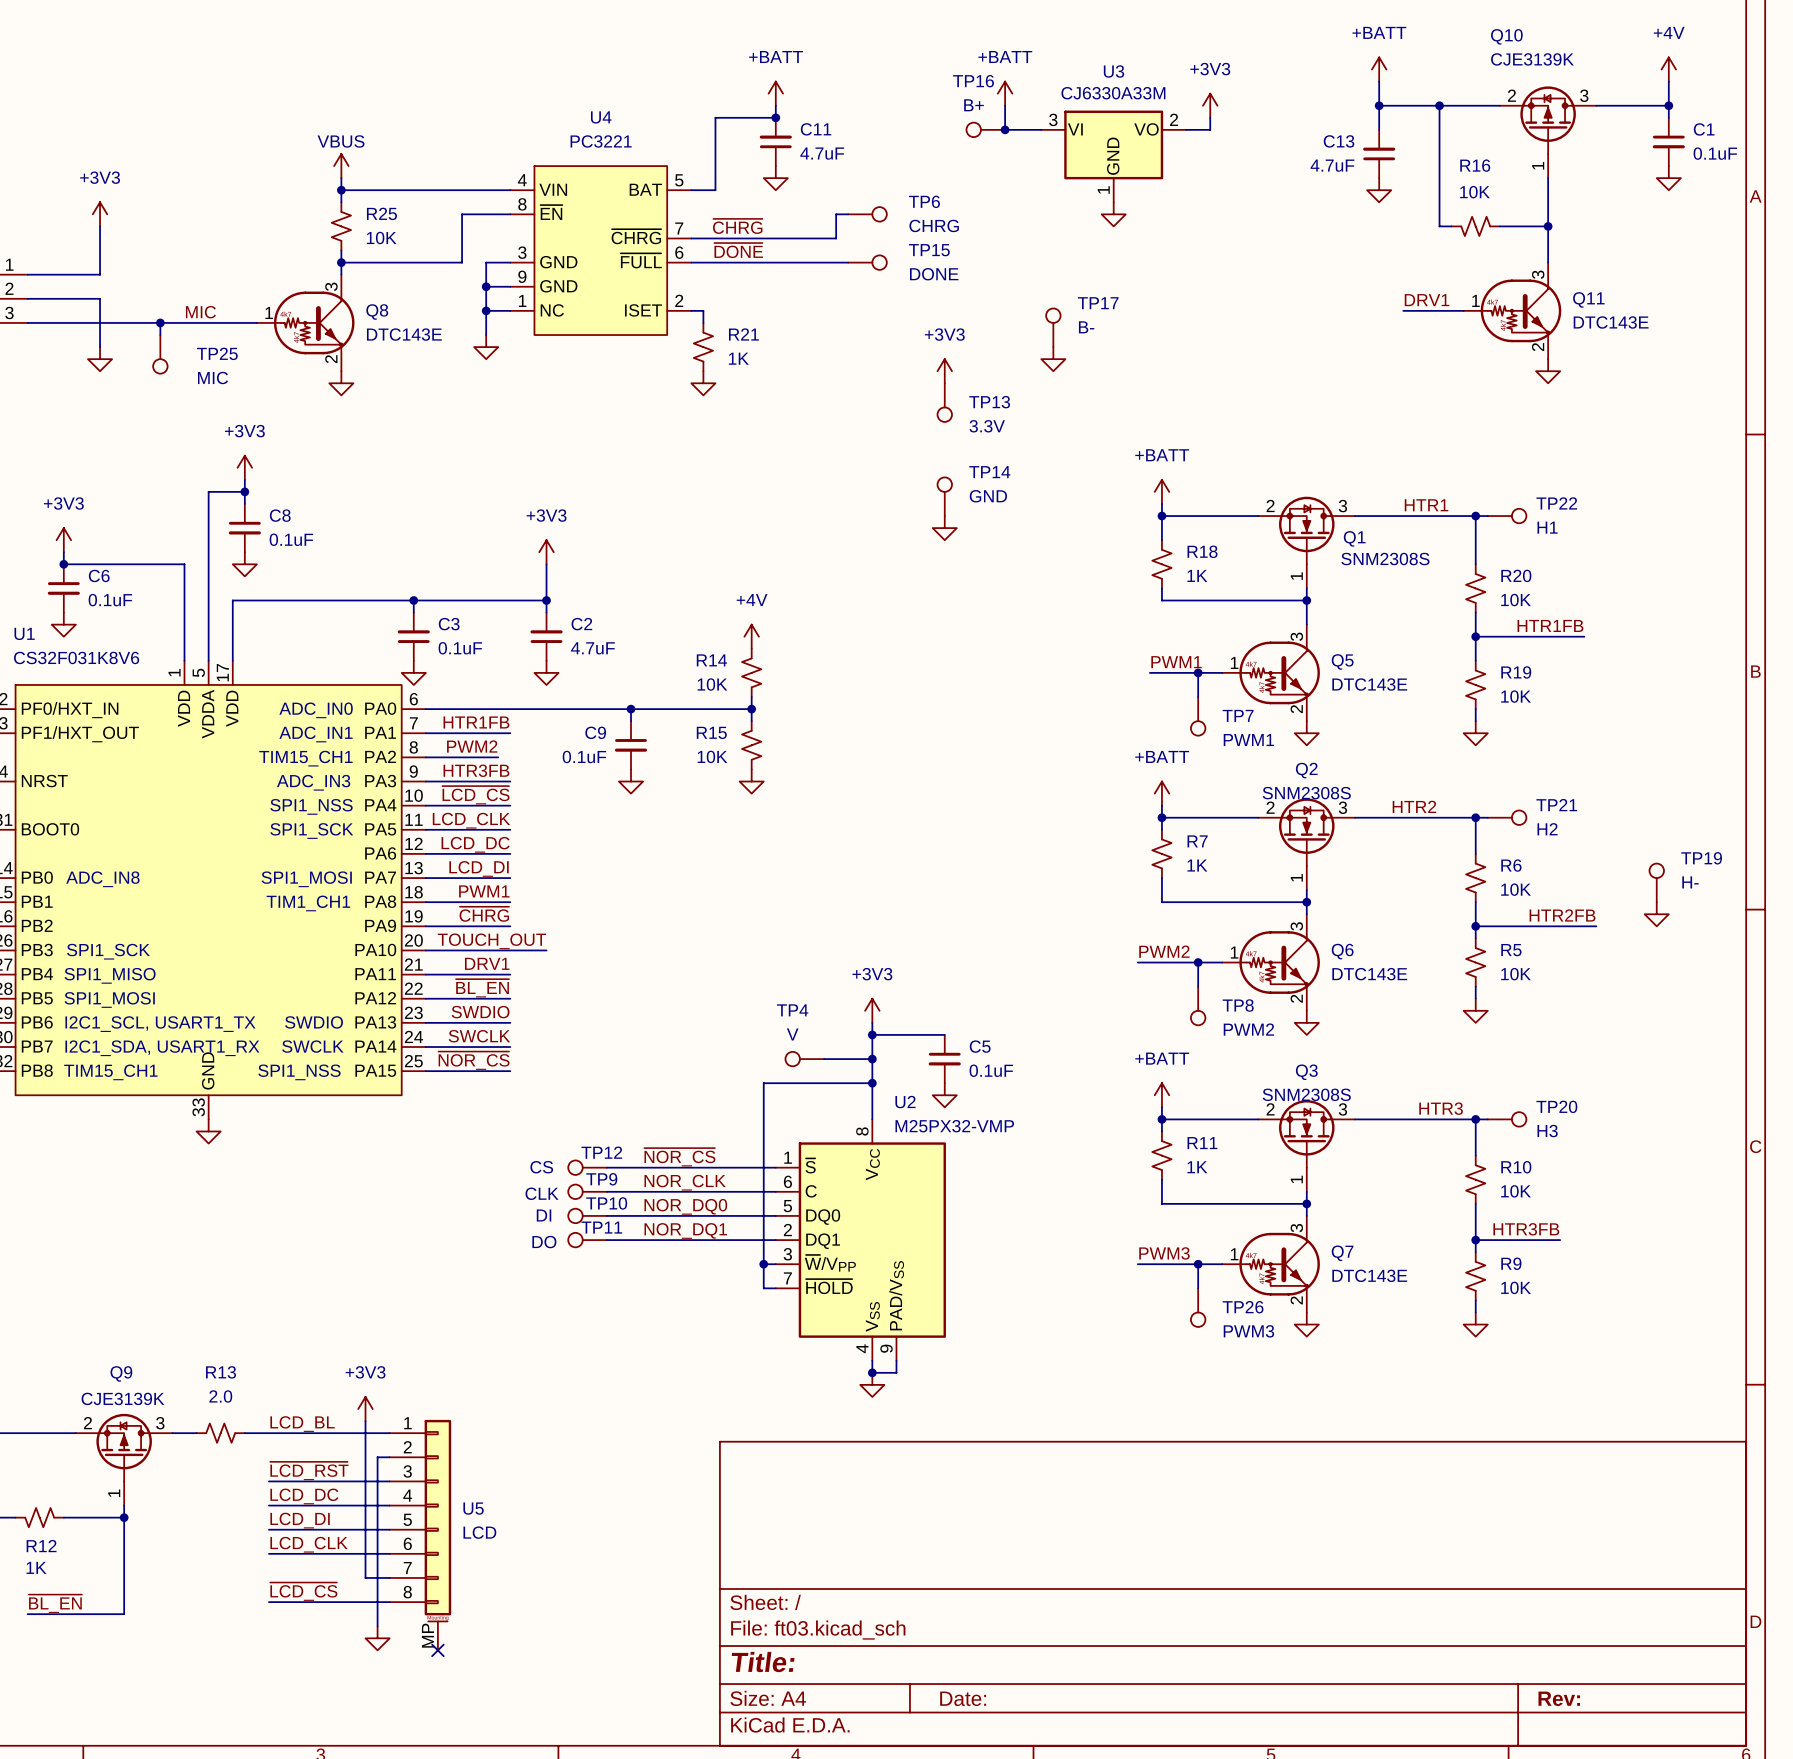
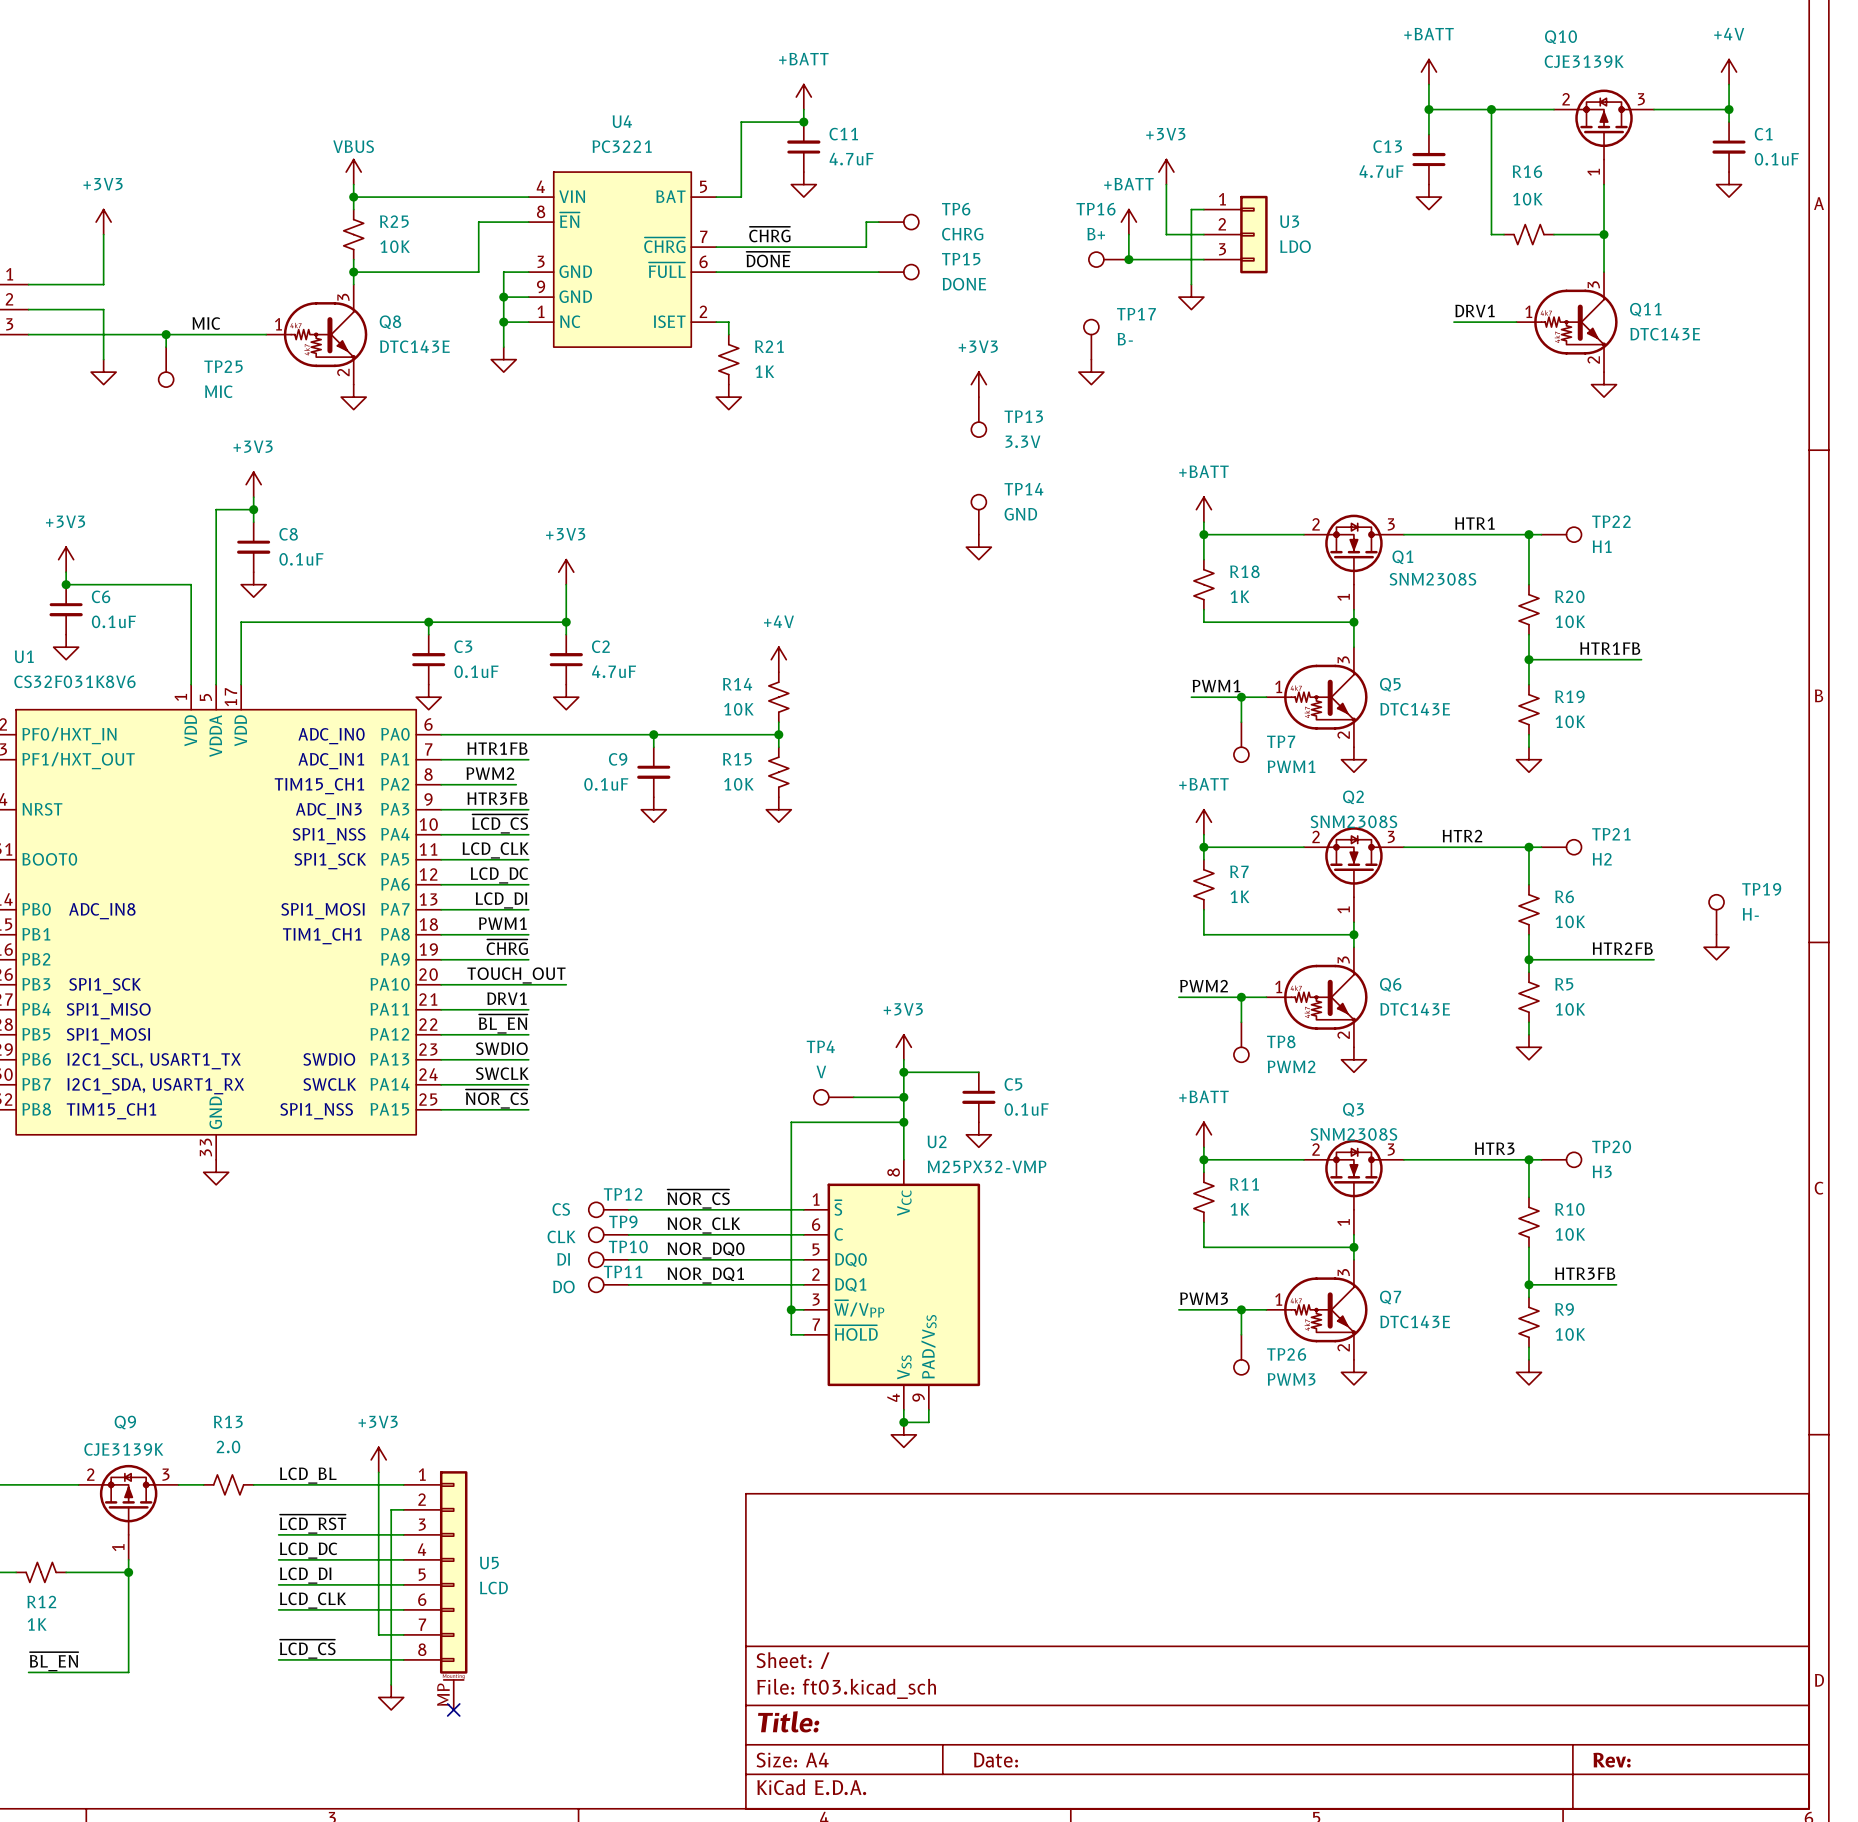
U3 name position: U3 (1113, 71) -> U3 (1289, 221)
power symbol position: +BATT (1005, 93) -> +BATT (1128, 222)
U3 value: CJ6330A33M (1113, 93) -> LDO (1295, 246)
wire: (1005, 105) (1005, 129) (1041, 129) -> none
power symbol position: +3V3 (1210, 105) -> +3V3 (1166, 172)
U3 symbol: [1041, 110, 1187, 203] -> [1203, 195, 1268, 274]
wire: (1210, 117) (1210, 129) (1186, 129) -> none
TP16 position: (985, 129) -> (1108, 259)
junction: (1005, 129) -> none
wire: none -> (1166, 184) (1166, 234) (1203, 234)
wire: none -> (1203, 209) (1191, 209) (1191, 284)
power symbol position: (1113, 214) -> (1191, 297)
wire: none -> (1128, 234) (1128, 259) (1203, 259)
junction: none -> (1128, 259)

